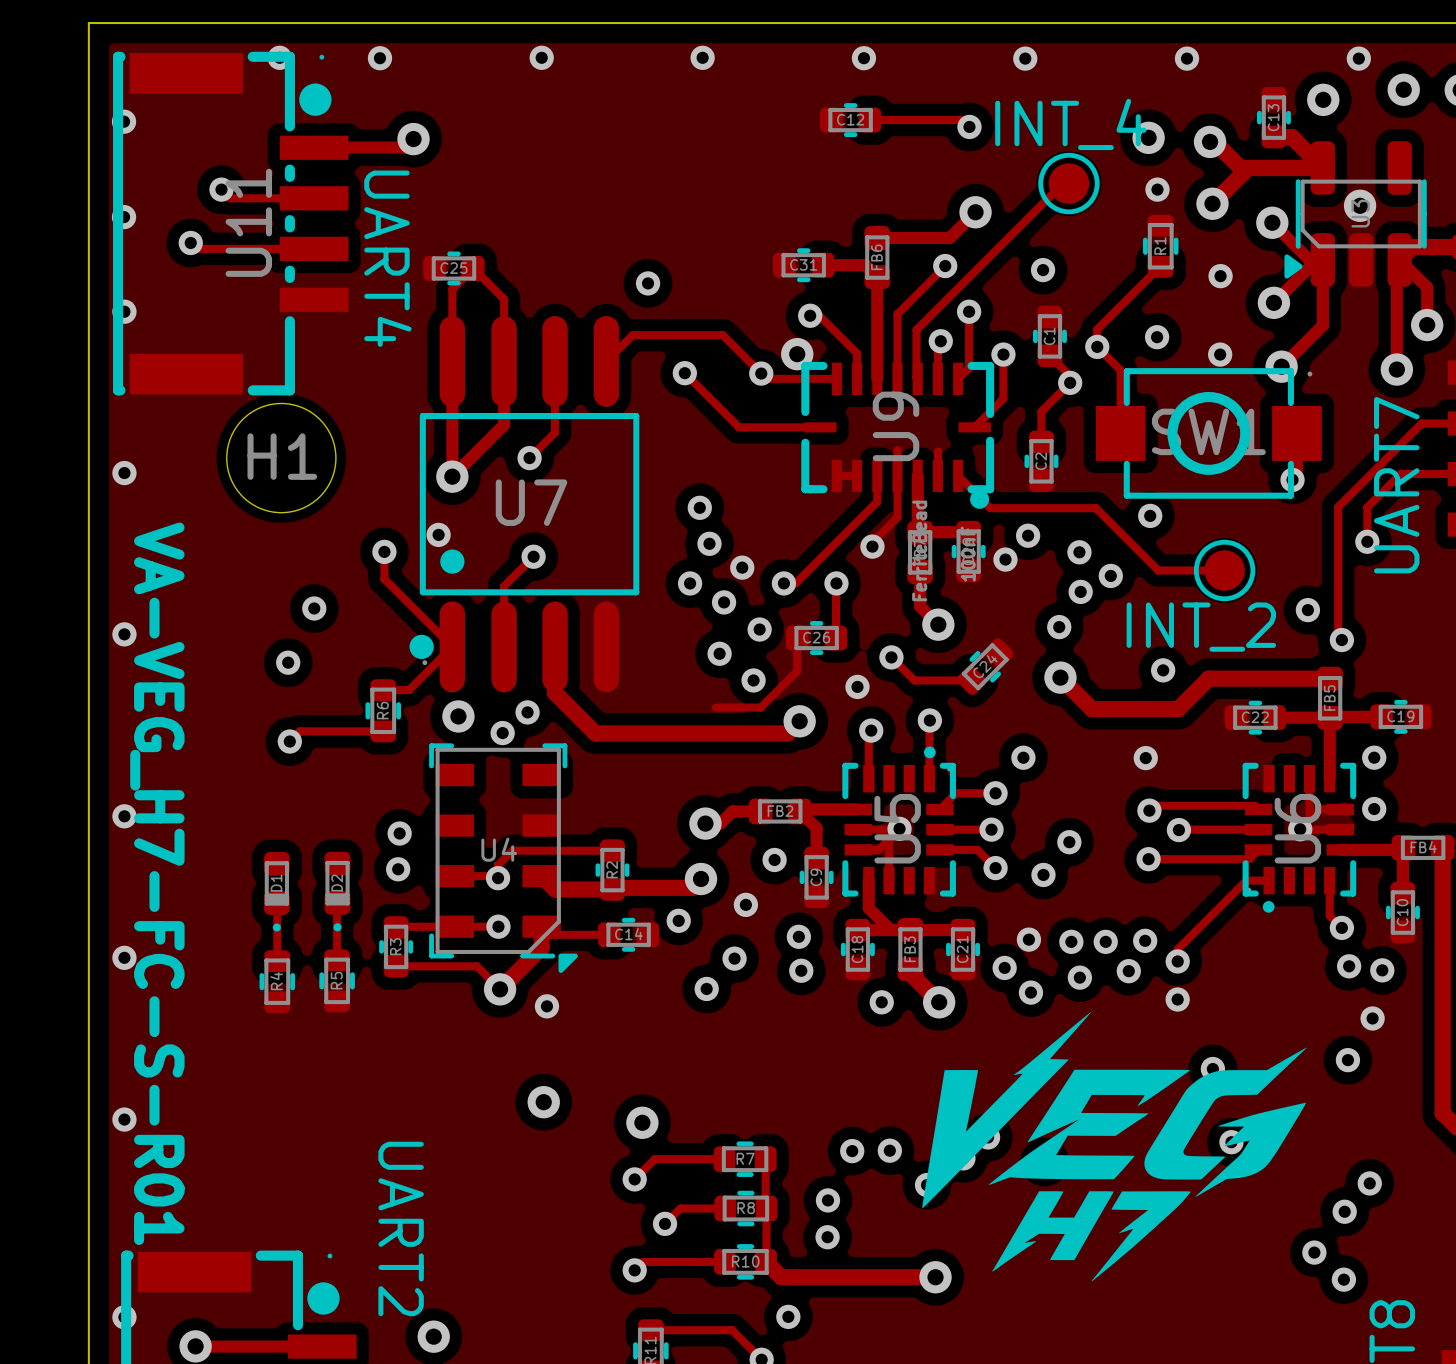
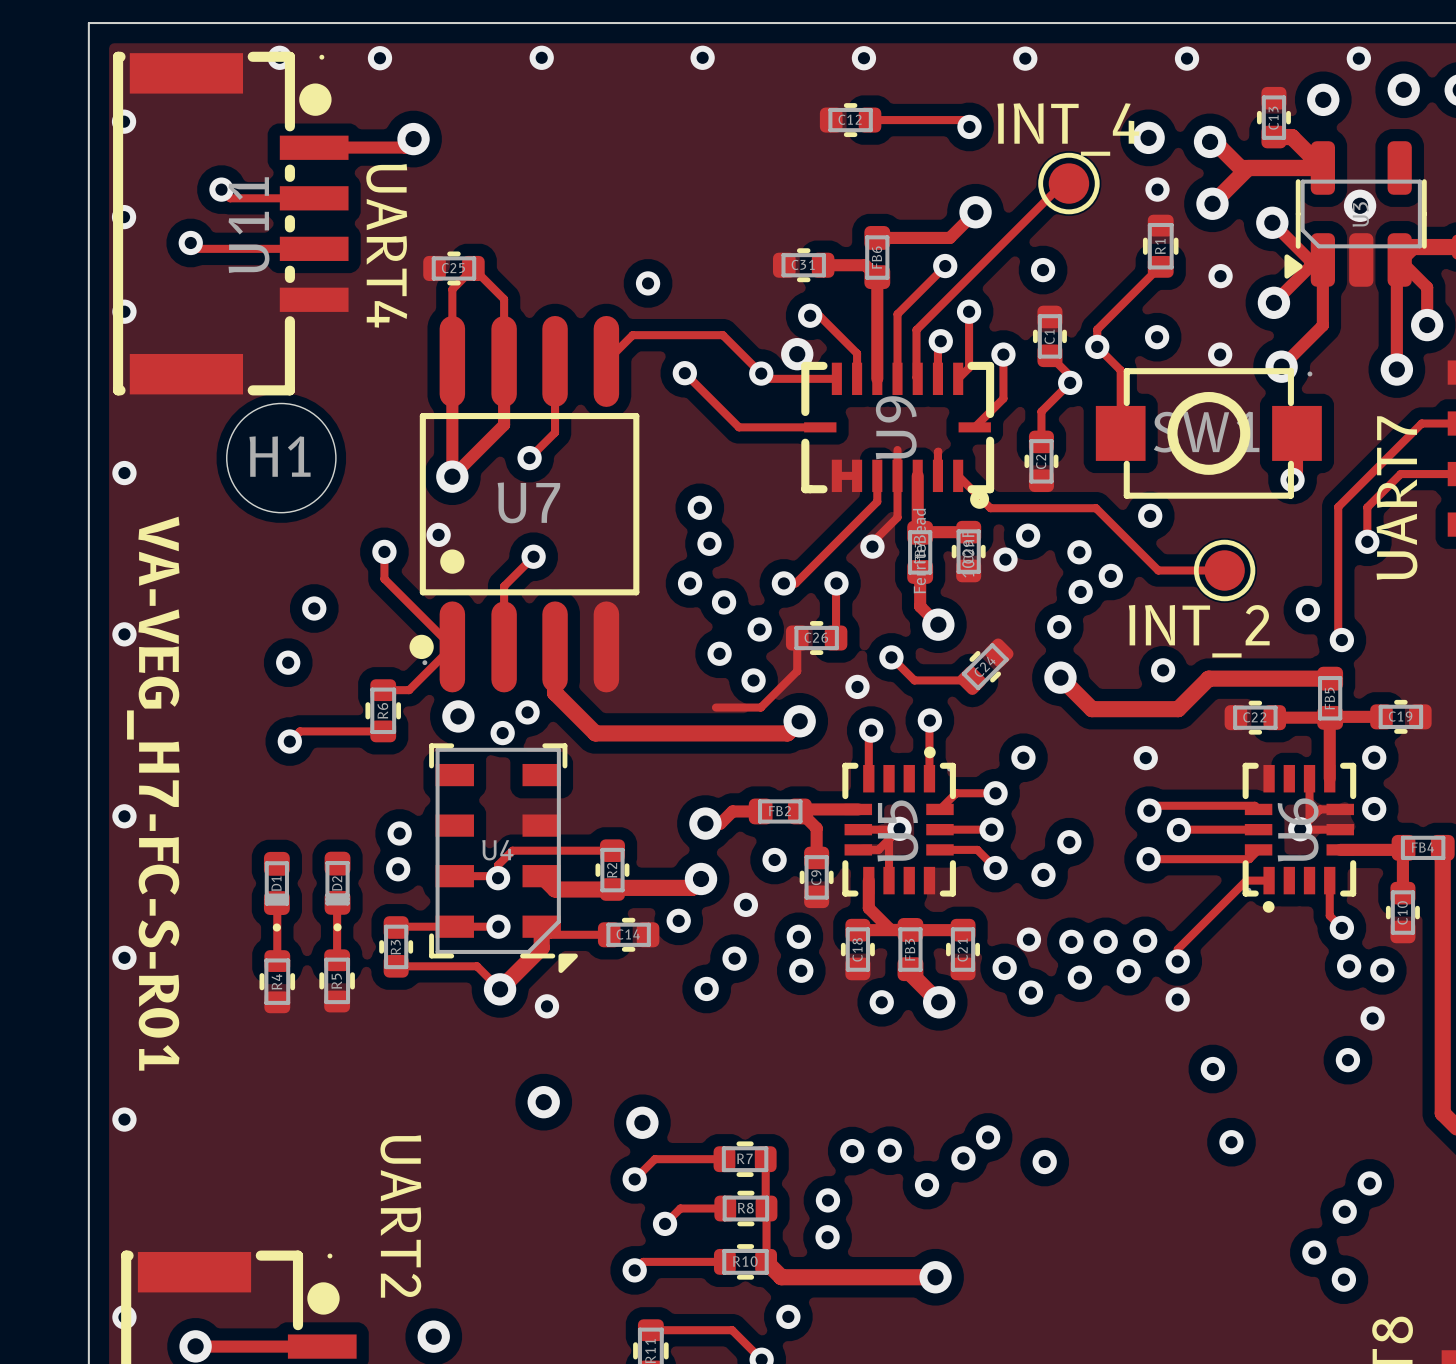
via: (742, 567) -> none
drawing: [922, 1011, 1308, 1282] -> none

